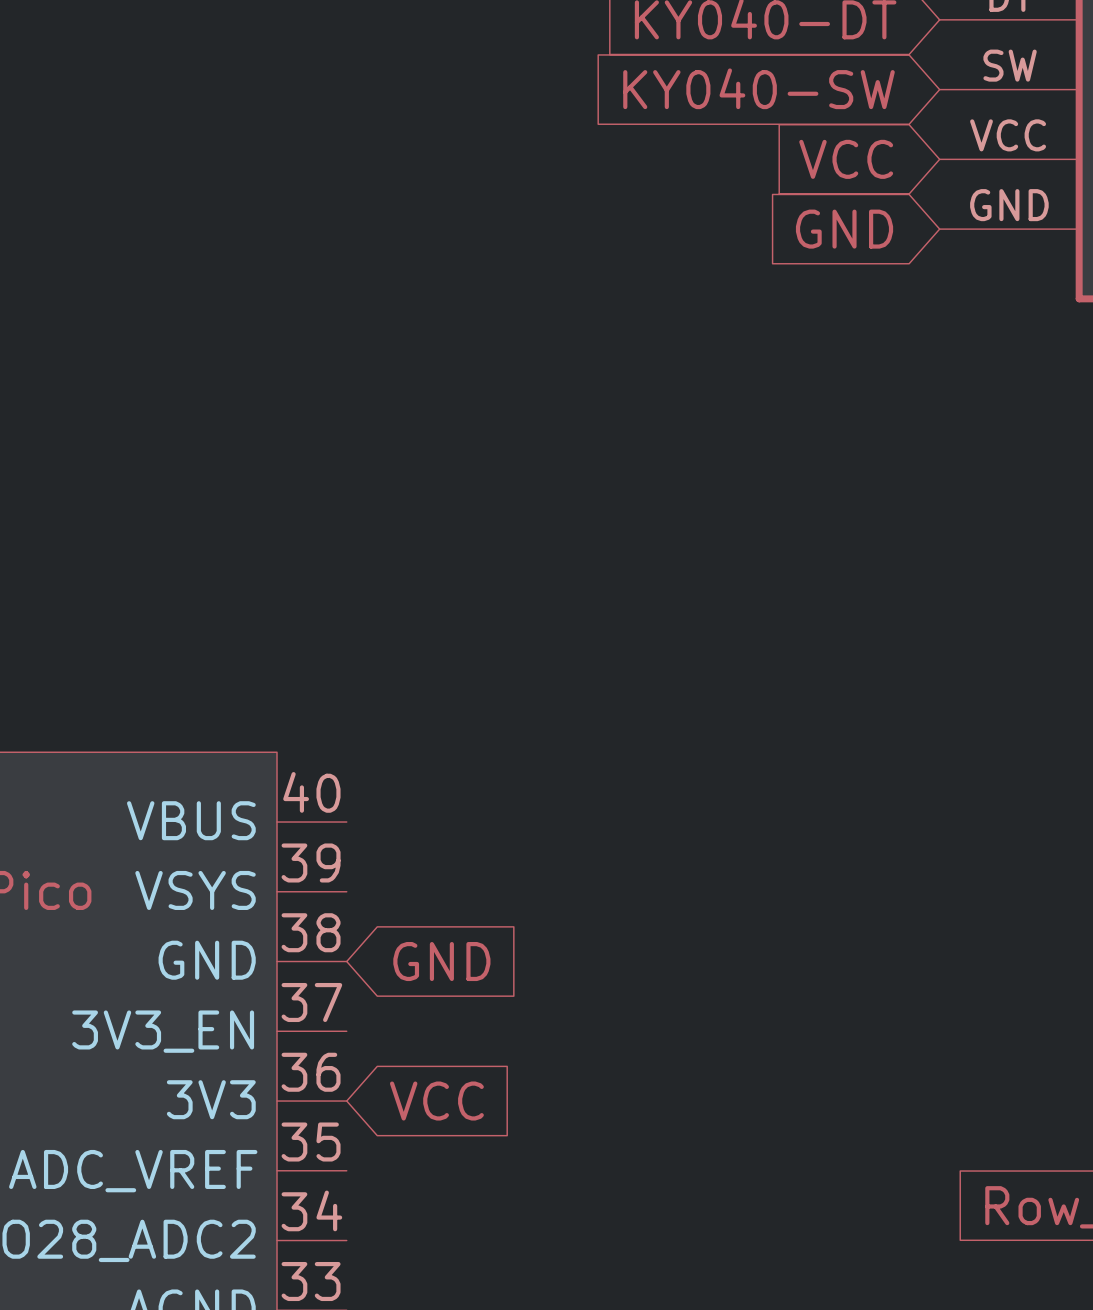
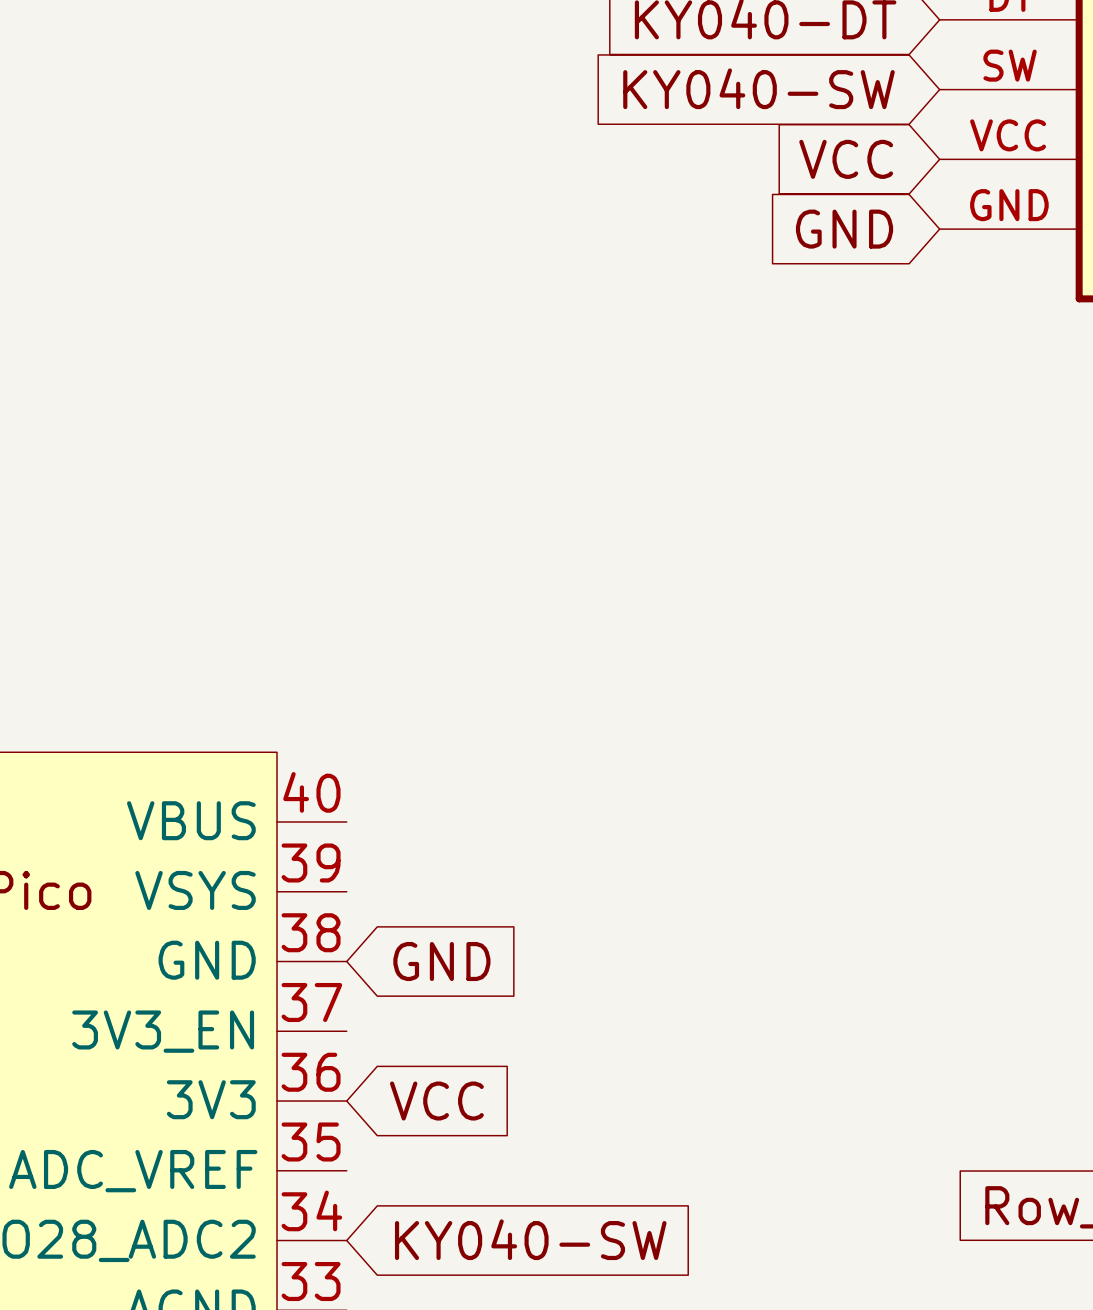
global label: none -> KY040-SW (530, 1239)

